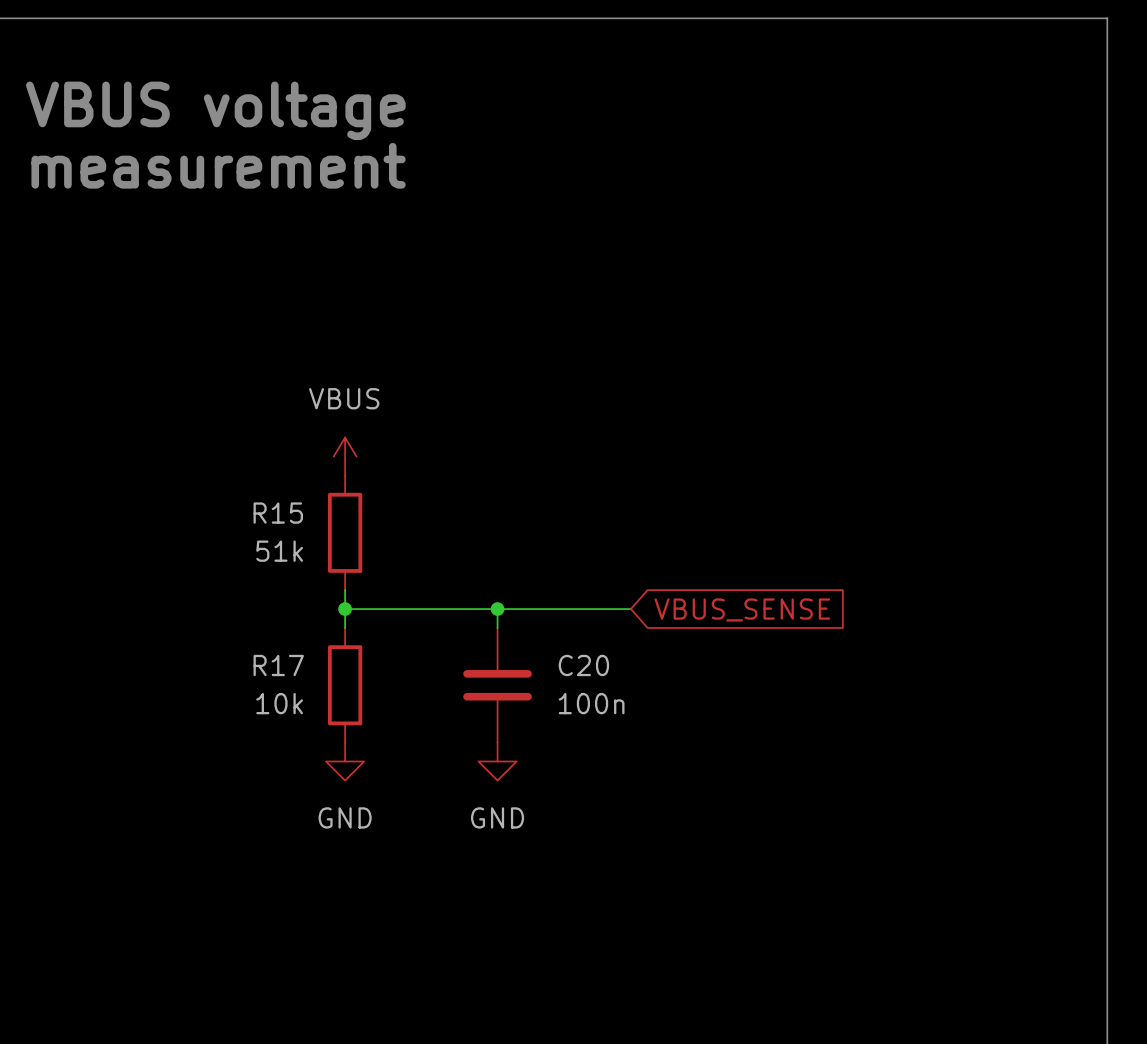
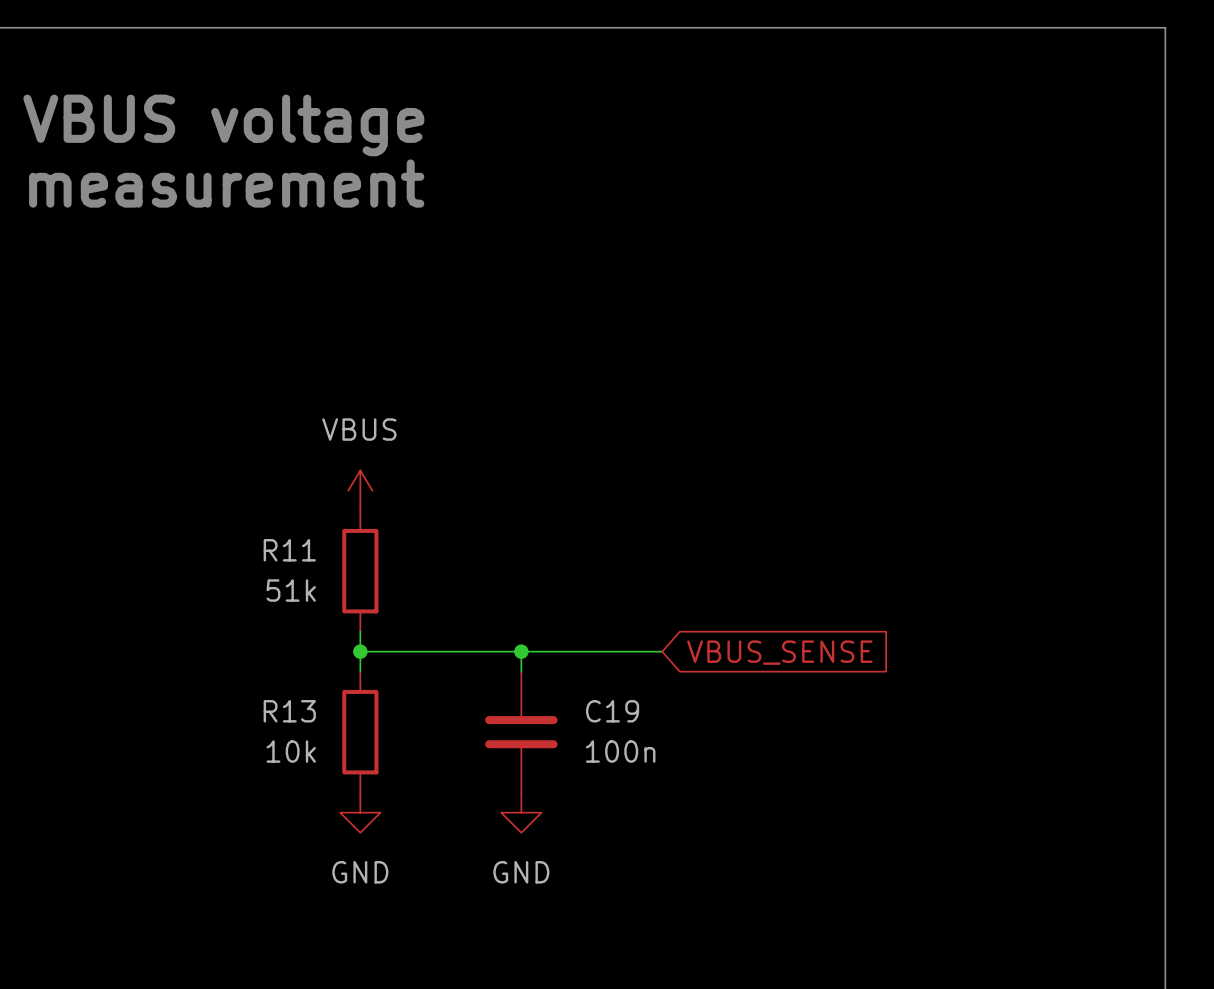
R15 name: R15 (278, 513) -> R11 (289, 550)
R17 name: R17 (278, 665) -> R13 (289, 711)
C20 name: C20 (583, 665) -> C19 (612, 711)

